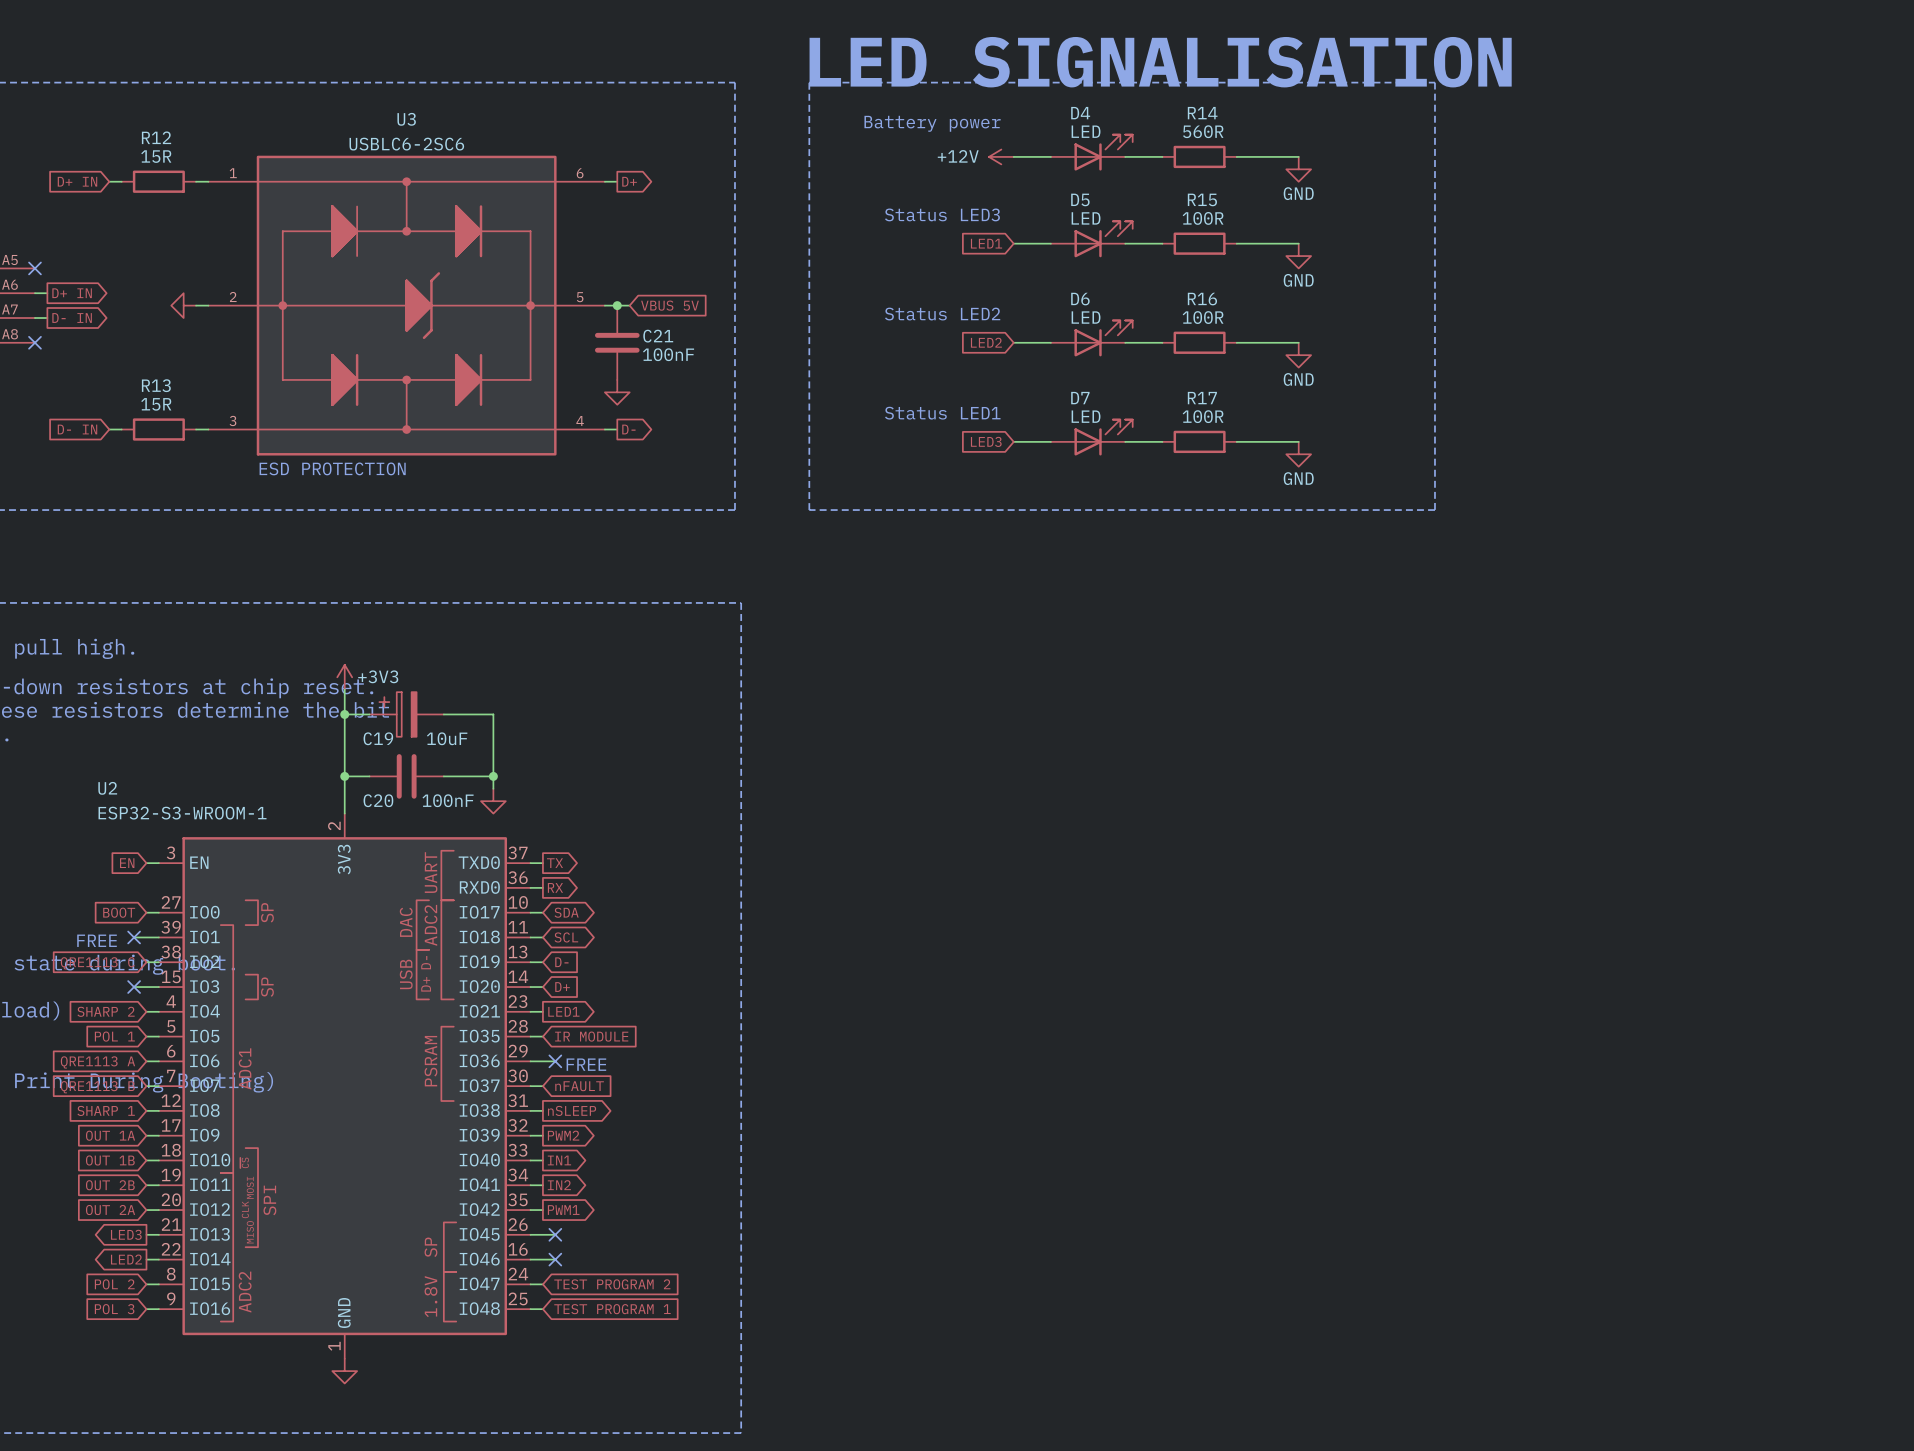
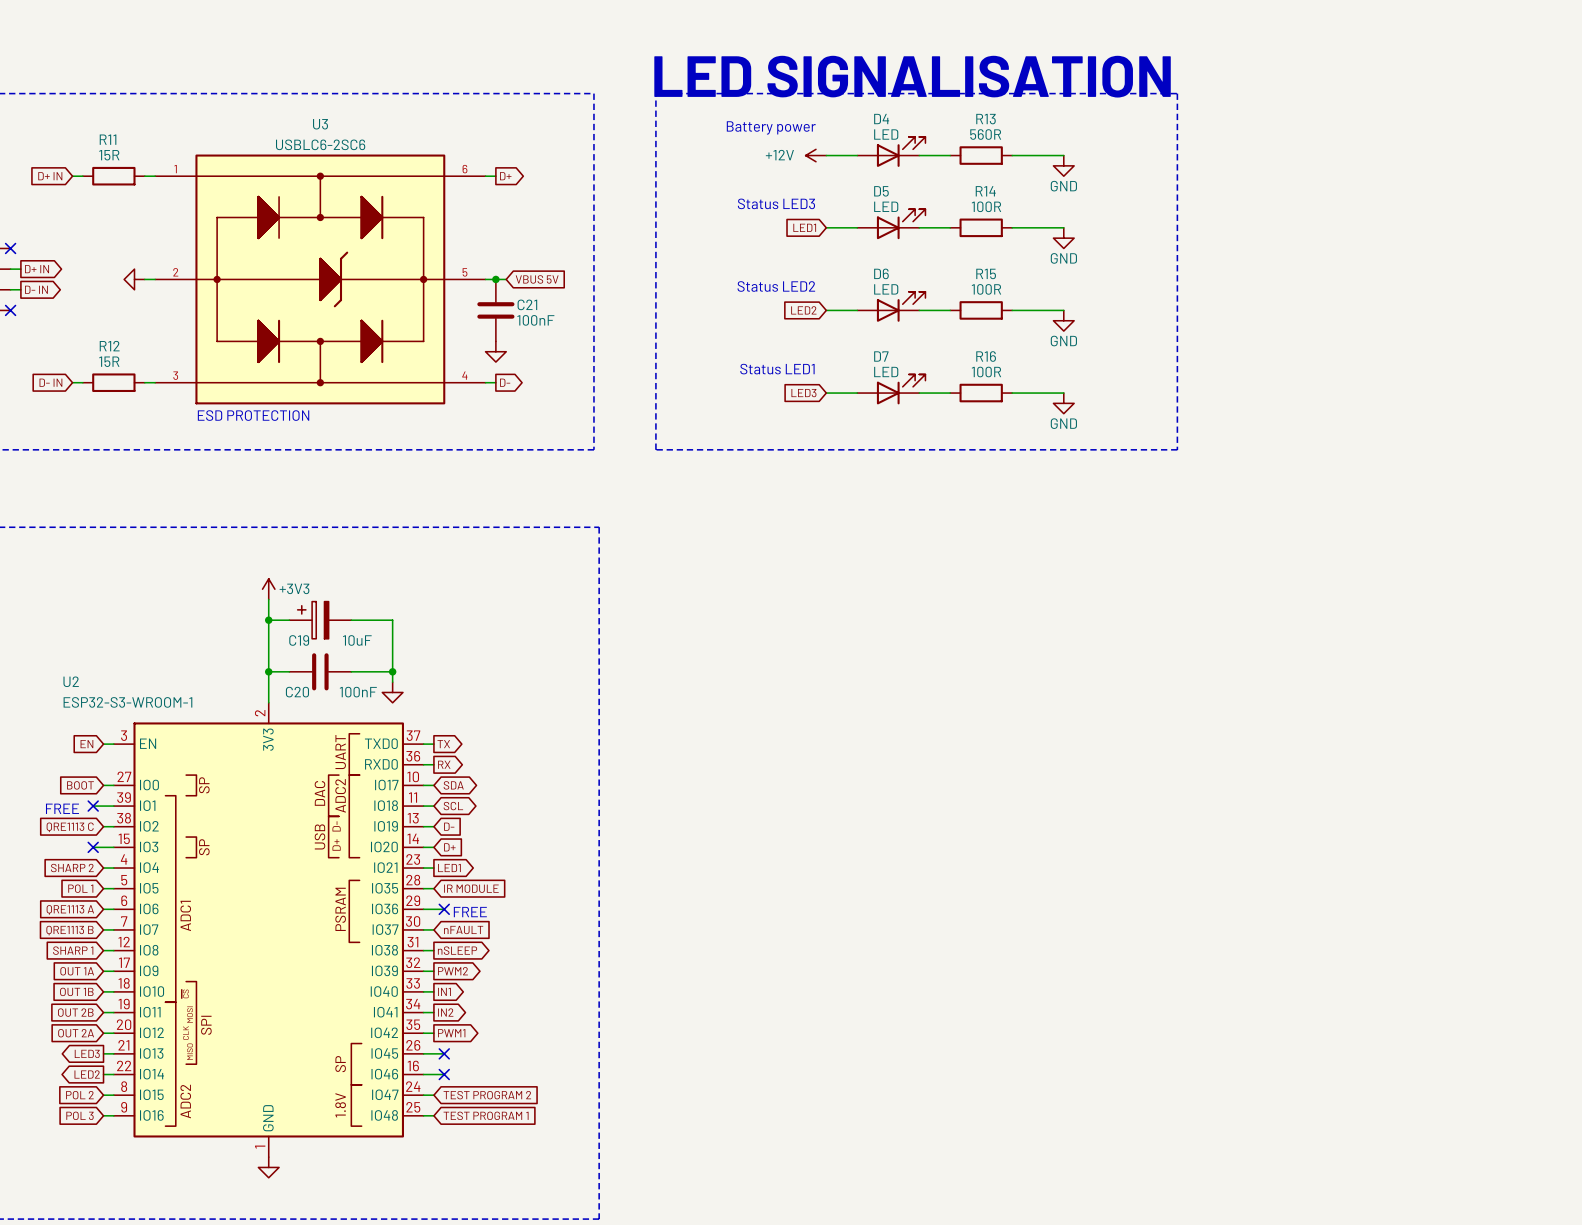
R14 name: R14 (1202, 113) -> R13 (986, 119)
R12 name: R12 (156, 137) -> R11 (108, 139)
R15 name: R15 (1202, 199) -> R14 (985, 191)
R16 name: R16 (1202, 299) -> R15 (986, 273)
R13 name: R13 (156, 385) -> R12 (109, 346)
R17 name: R17 (1202, 398) -> R16 (986, 356)

